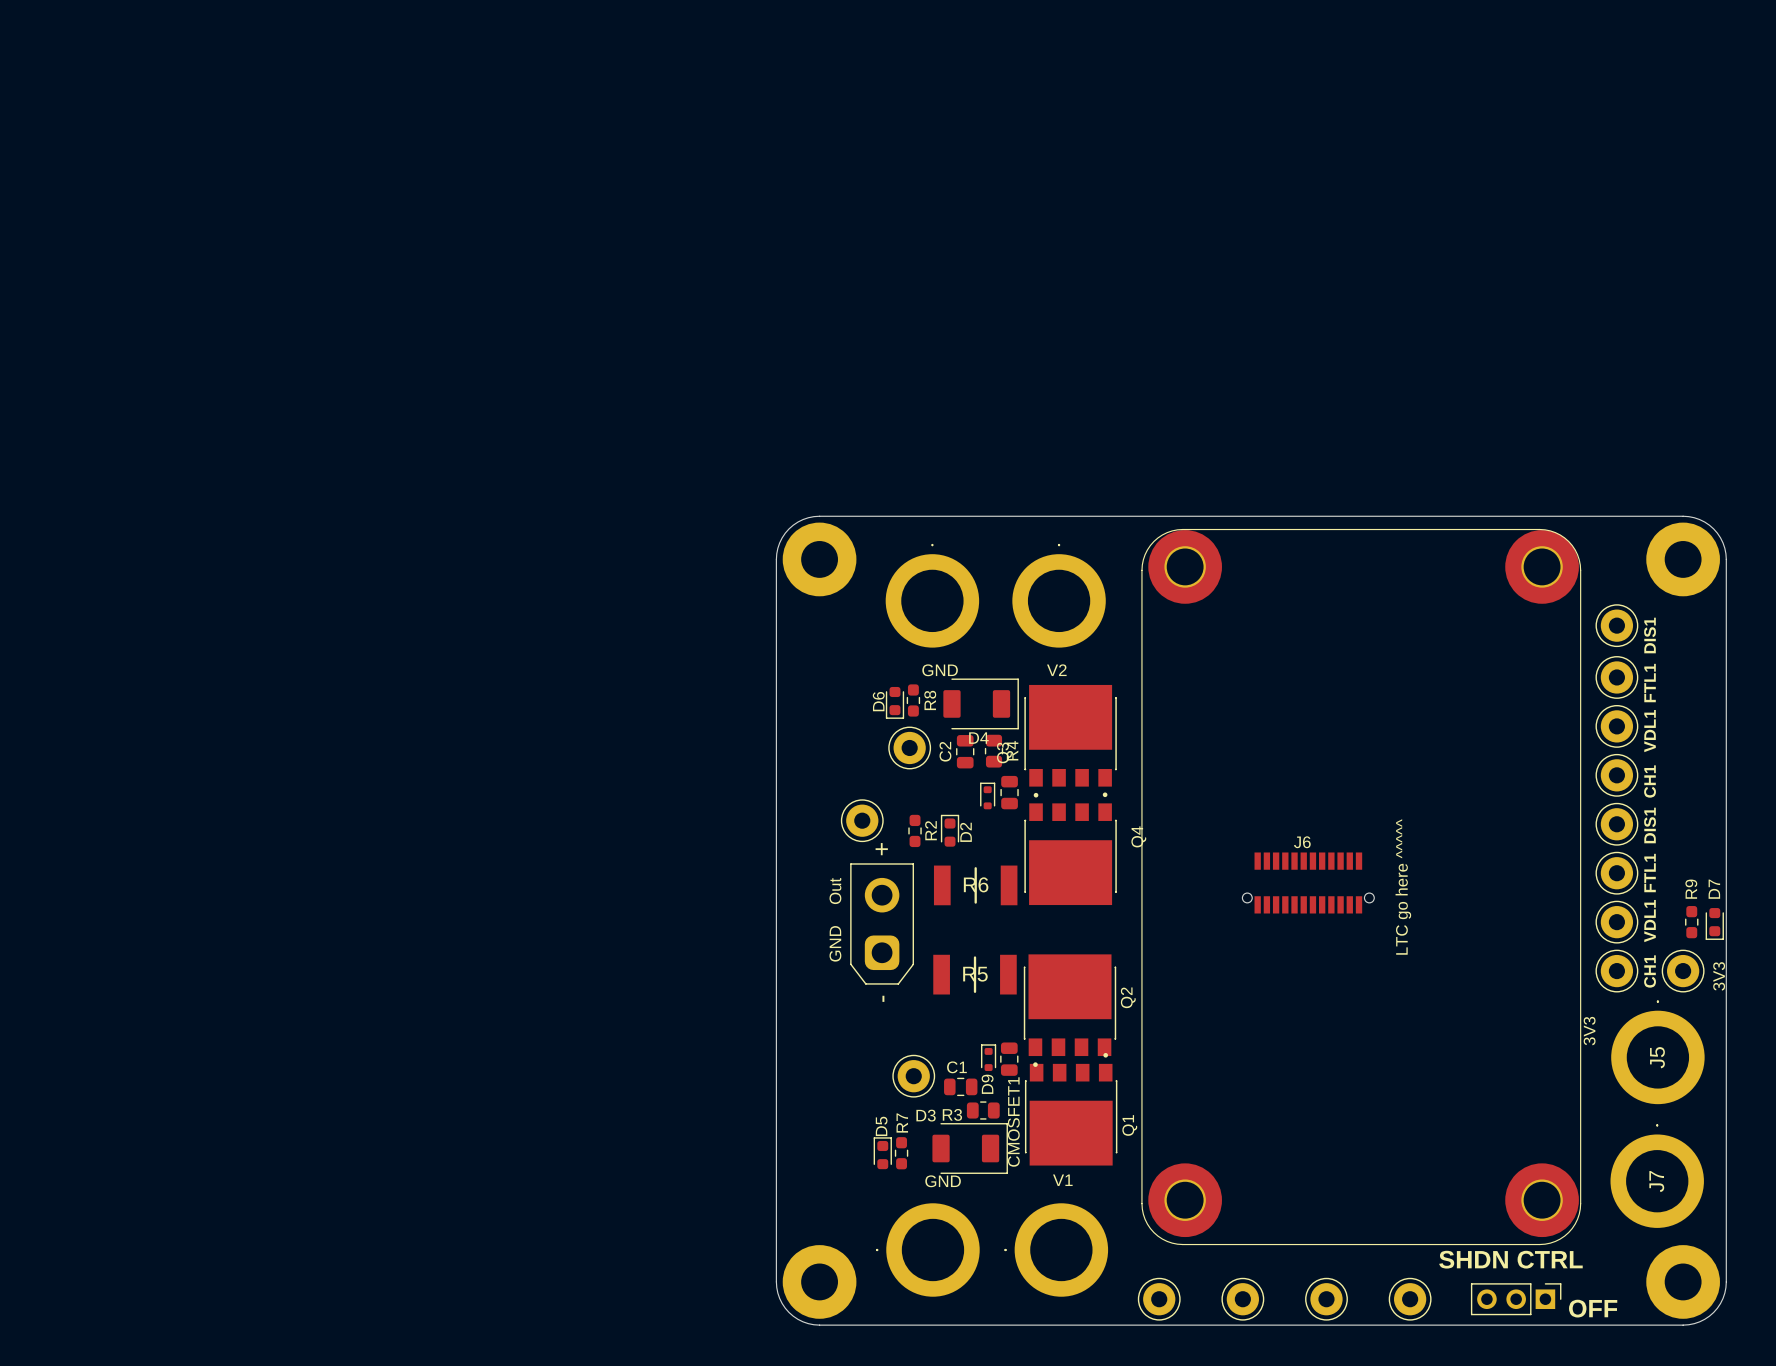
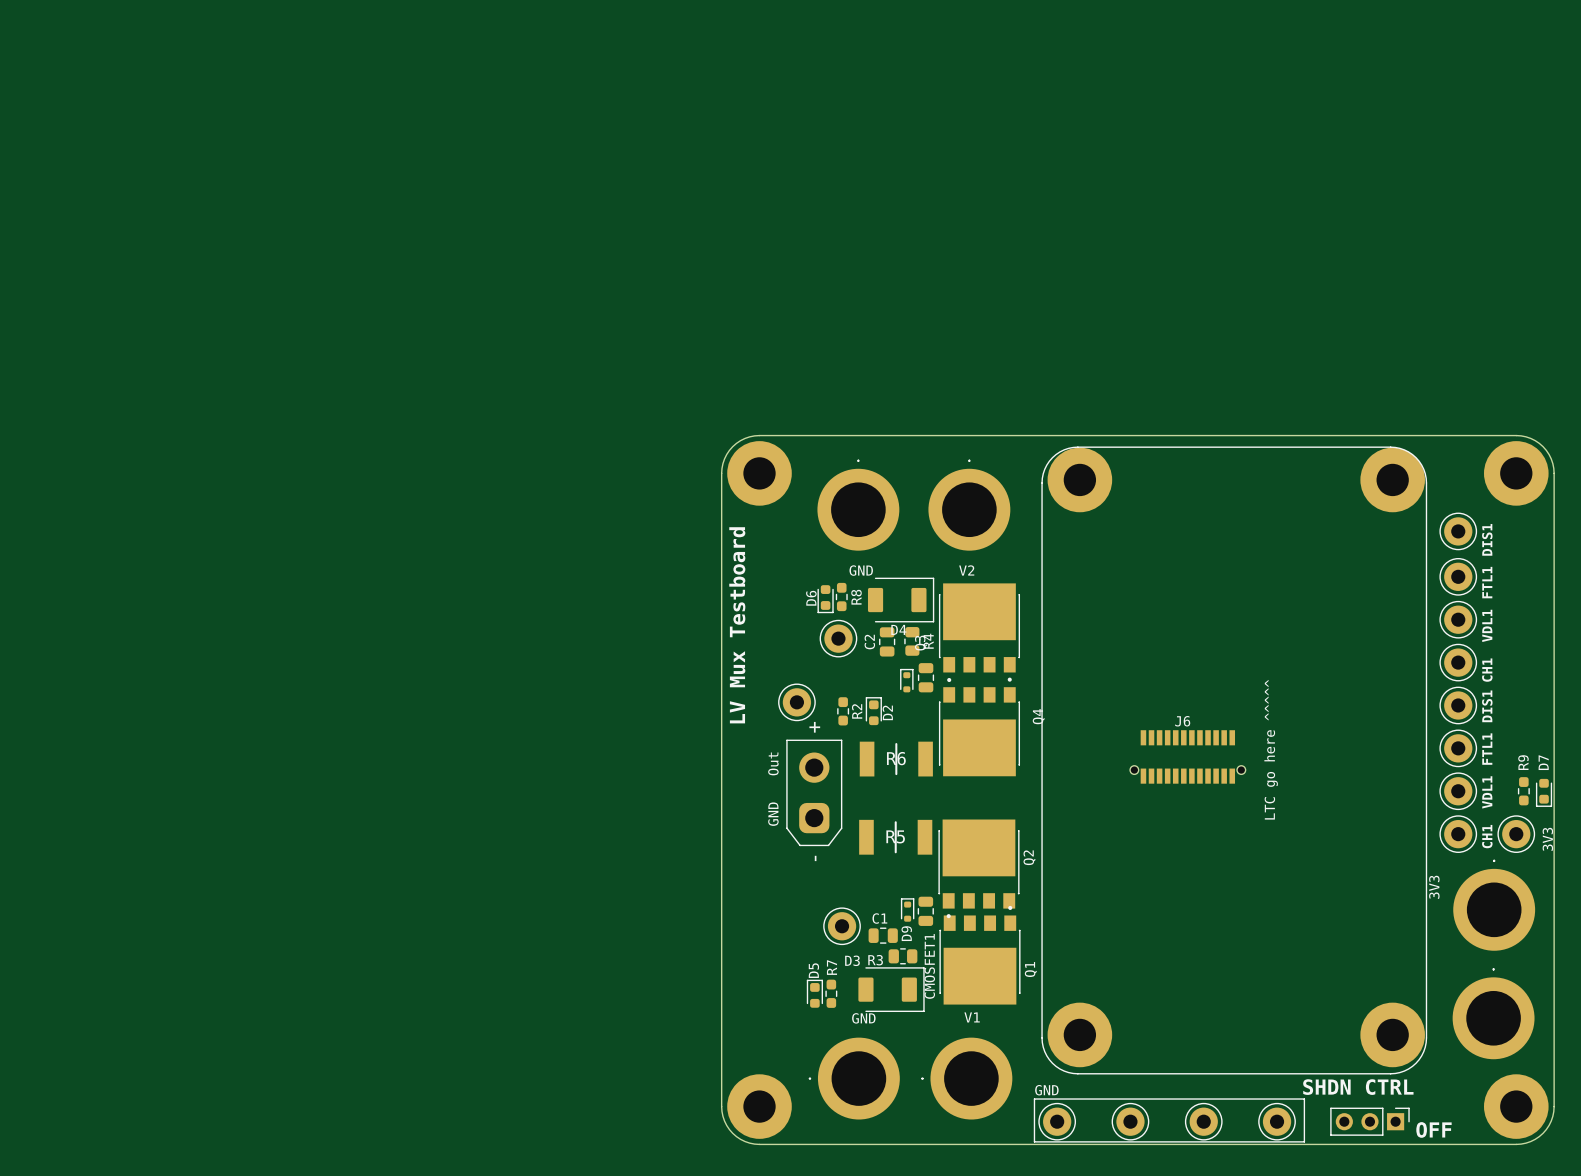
text: none -> LV Mux Testboard (737, 625)
J5 name: J5 (1657, 1057) -> none
J7 name: J7 (1656, 1181) -> none
text: none -> GND (1046, 1090)
line: none -> (1034, 1099) (1304, 1099) (1304, 1141) (1034, 1141) (1034, 1099)

